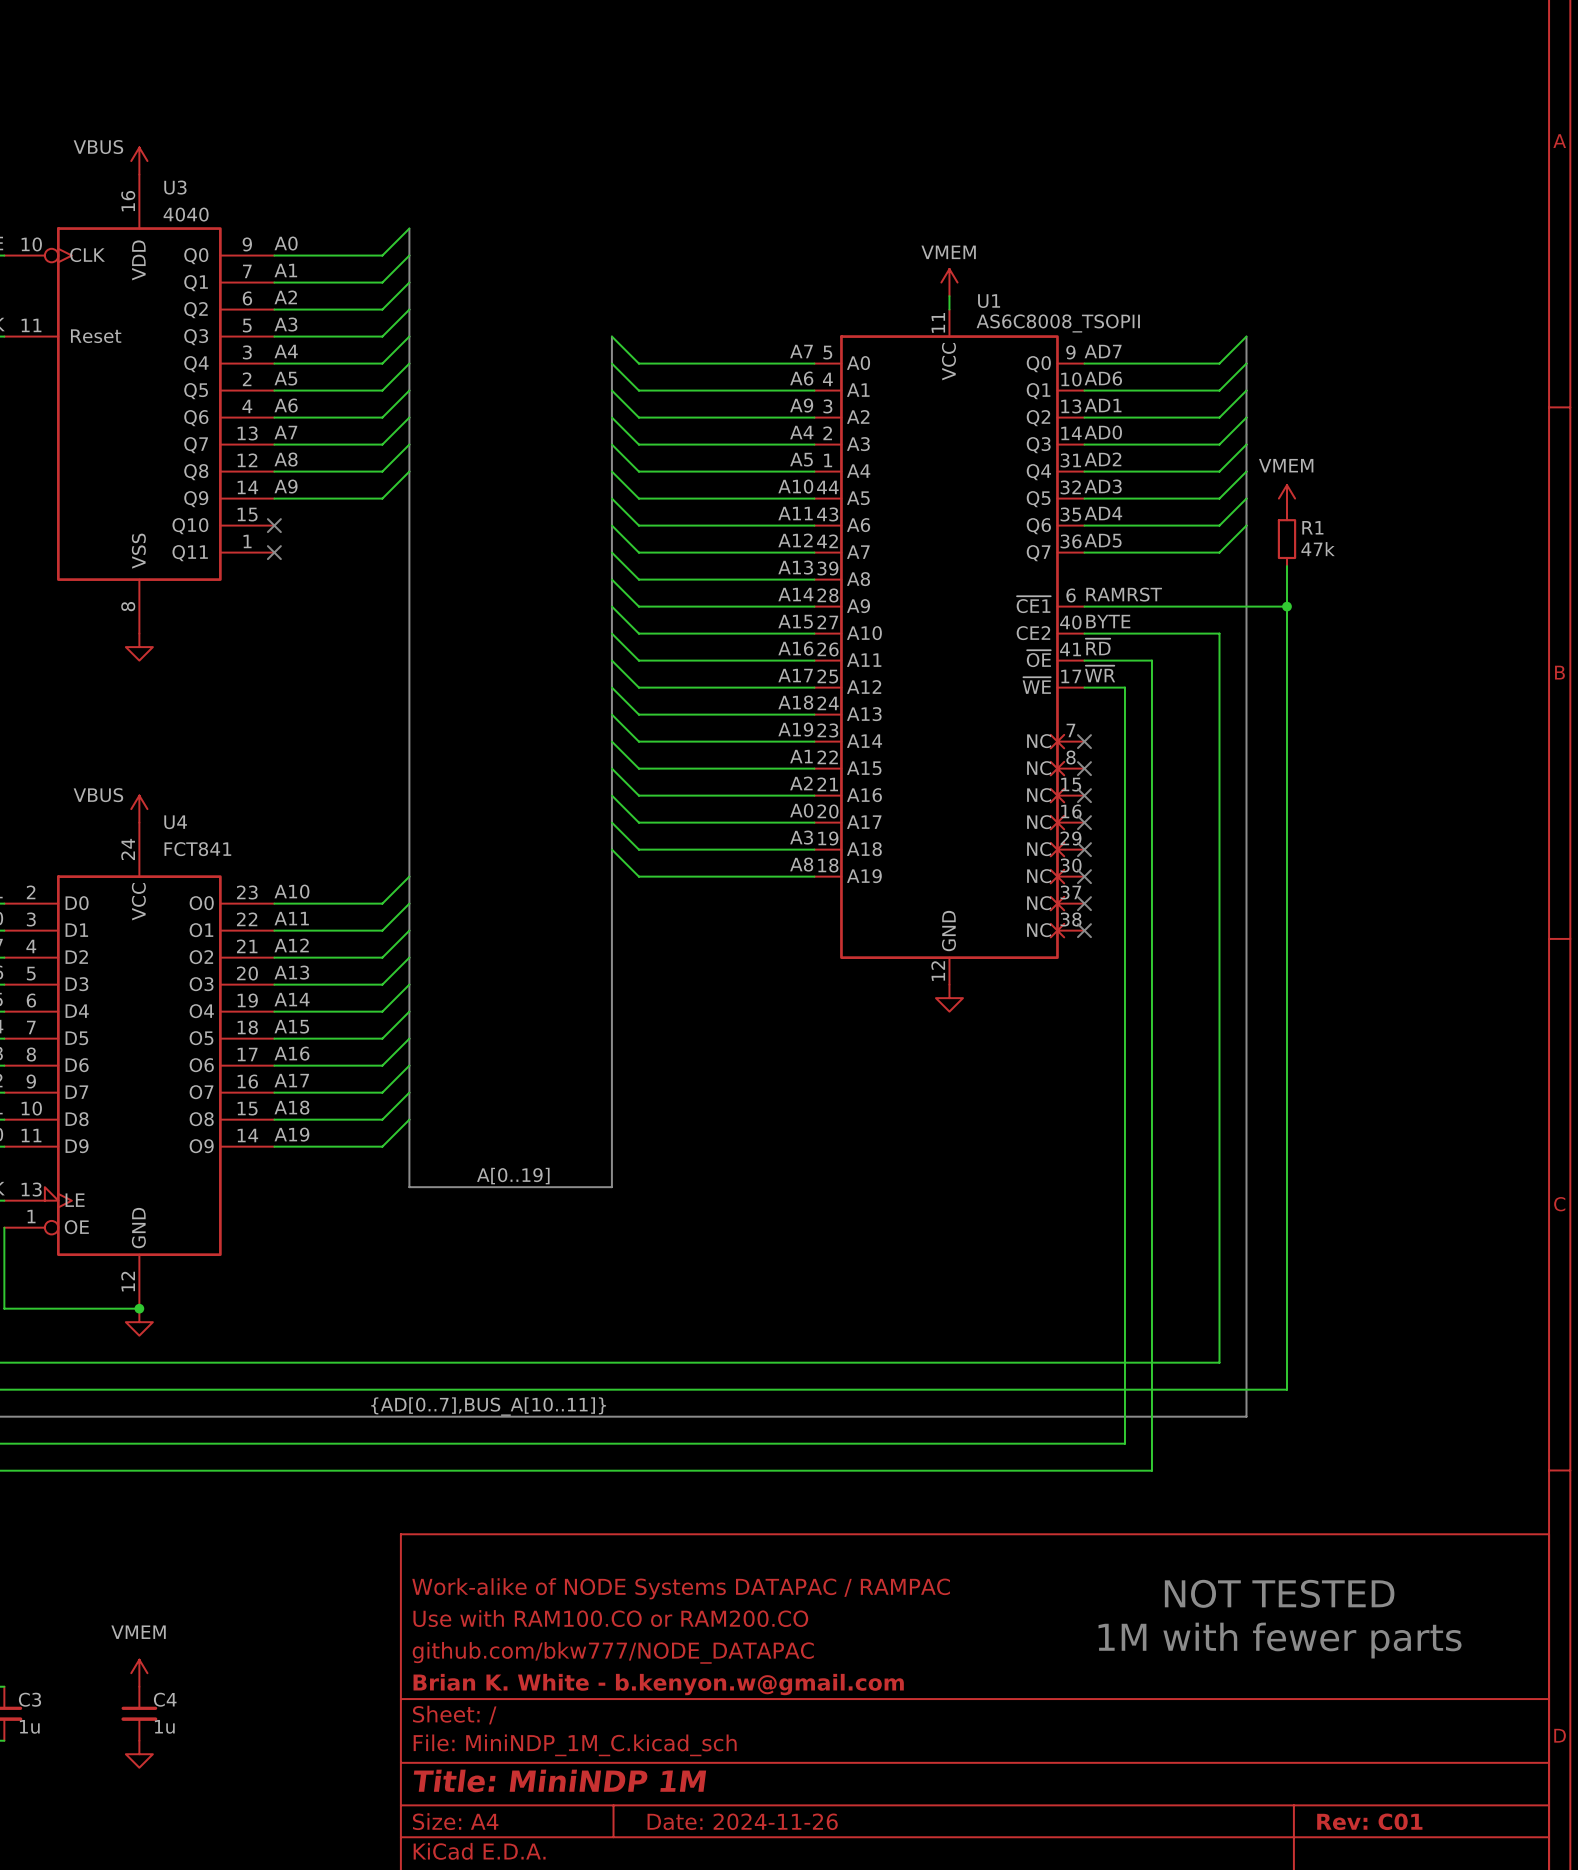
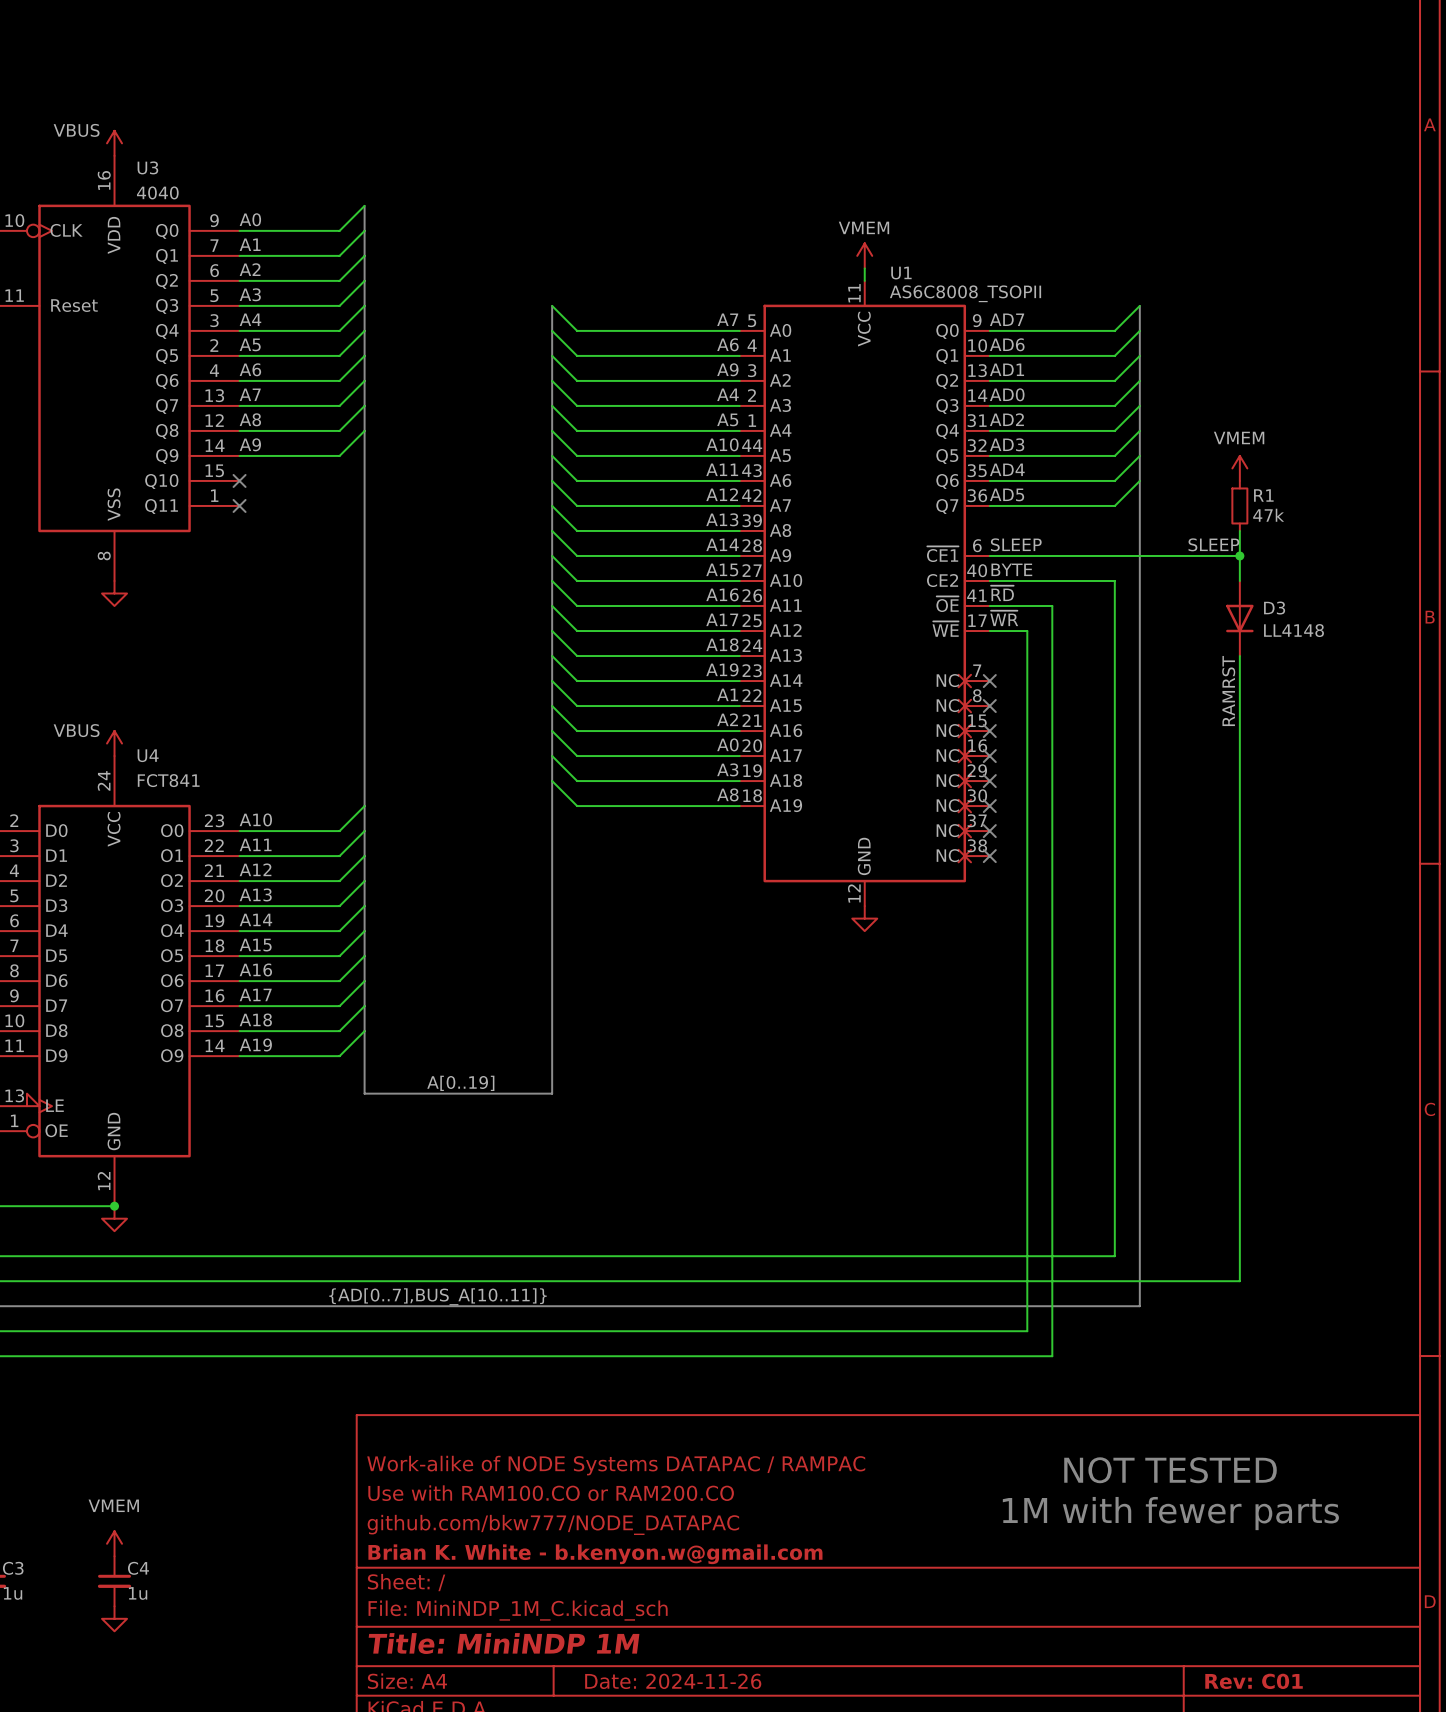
power symbol position: VMEM (1287, 498) -> VMEM (1239, 468)
R1 position: (1287, 539) -> (1239, 505)
wire: (1287, 566) (1287, 1389) -> (1239, 656) (1239, 1281) (1177, 1281)
wire: none -> (1239, 530) (1239, 580)
label: RAMRST (1124, 594) -> SLEEP (1016, 544)
label: none -> SLEEP (1213, 544)
wire: none -> (1177, 555) (1239, 555)
junction: (1287, 606) -> none
junction: none -> (1239, 555)
D3: none -> LL4148 (1239, 618)
label: none -> RAMRST (1228, 691)

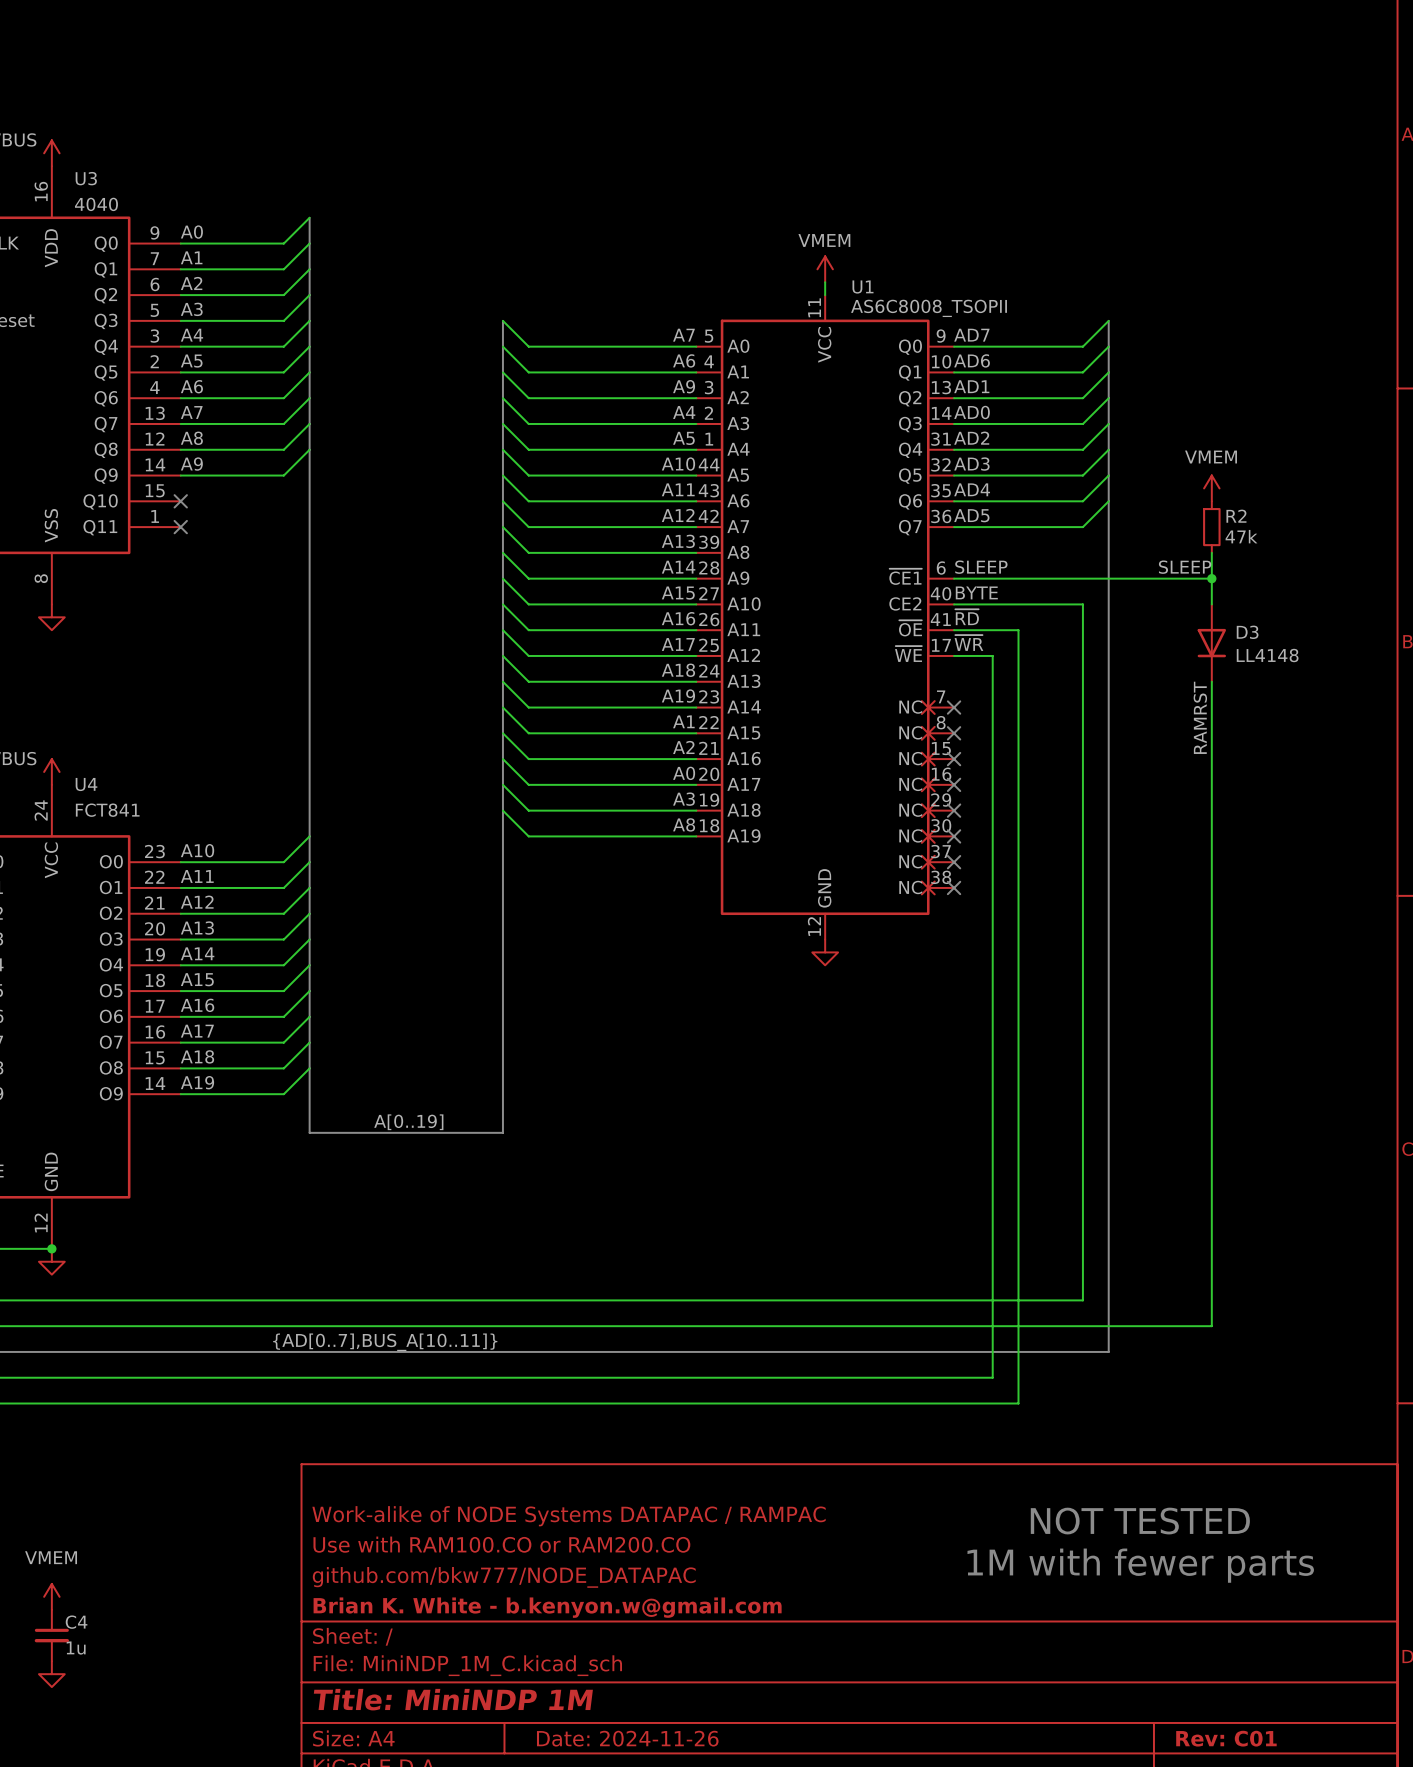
R1 name: R1 (1263, 495) -> R2 (1236, 516)

